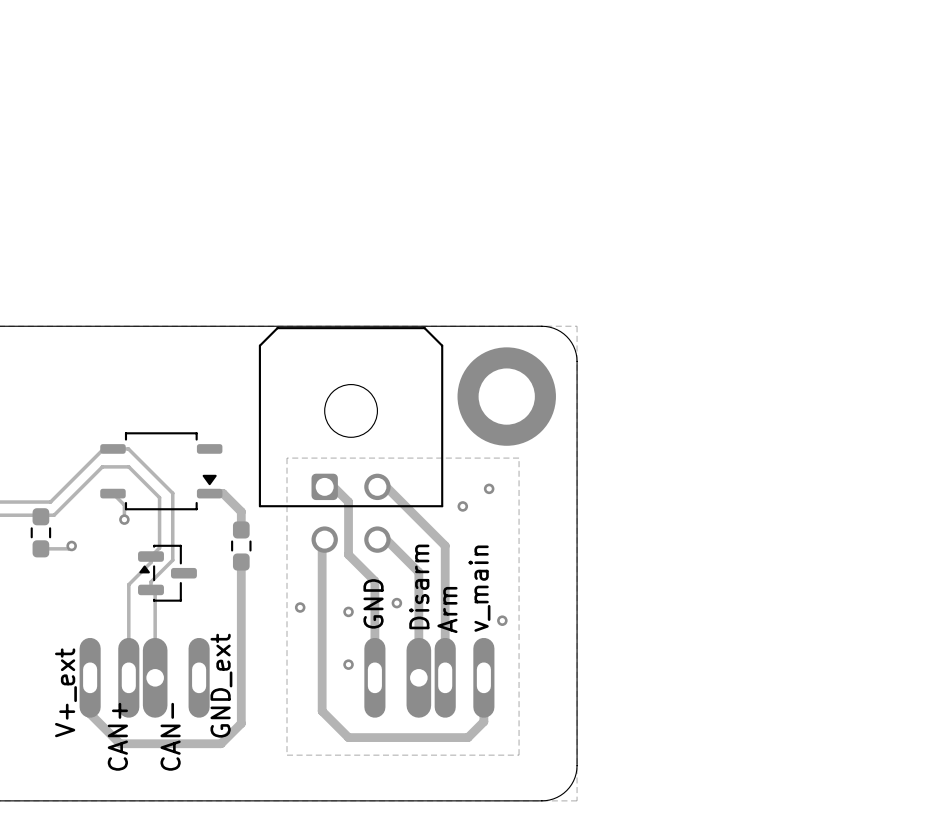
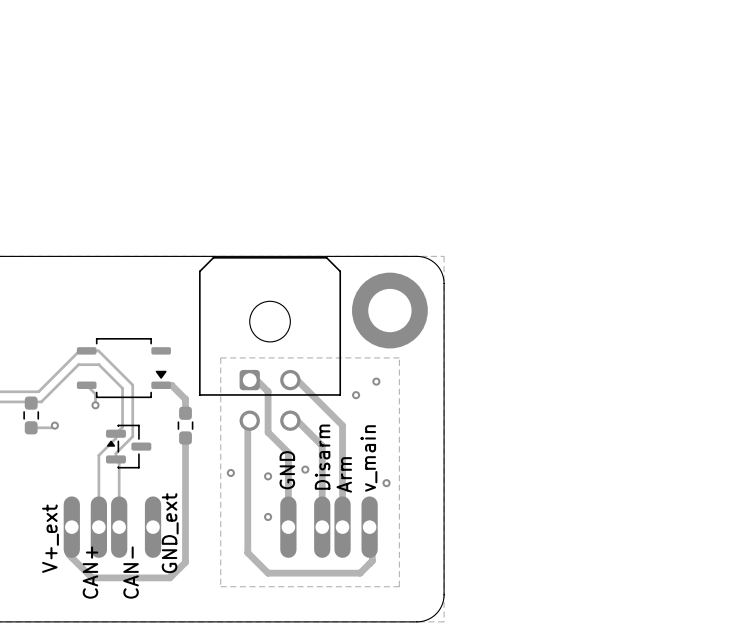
part footprint: [79, 637, 210, 718] -> [63, 496, 162, 558]
part footprint: [364, 637, 495, 718] -> [280, 496, 378, 558]

